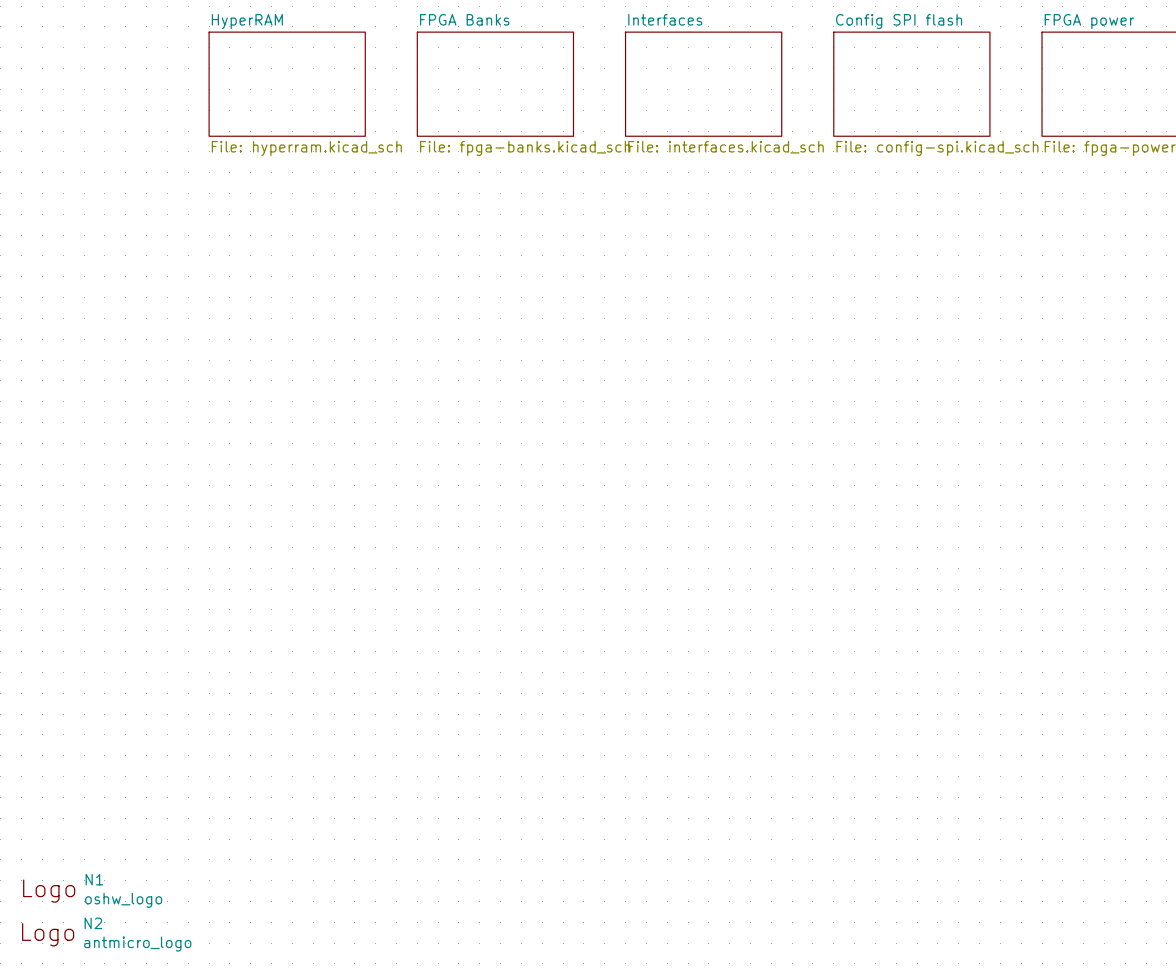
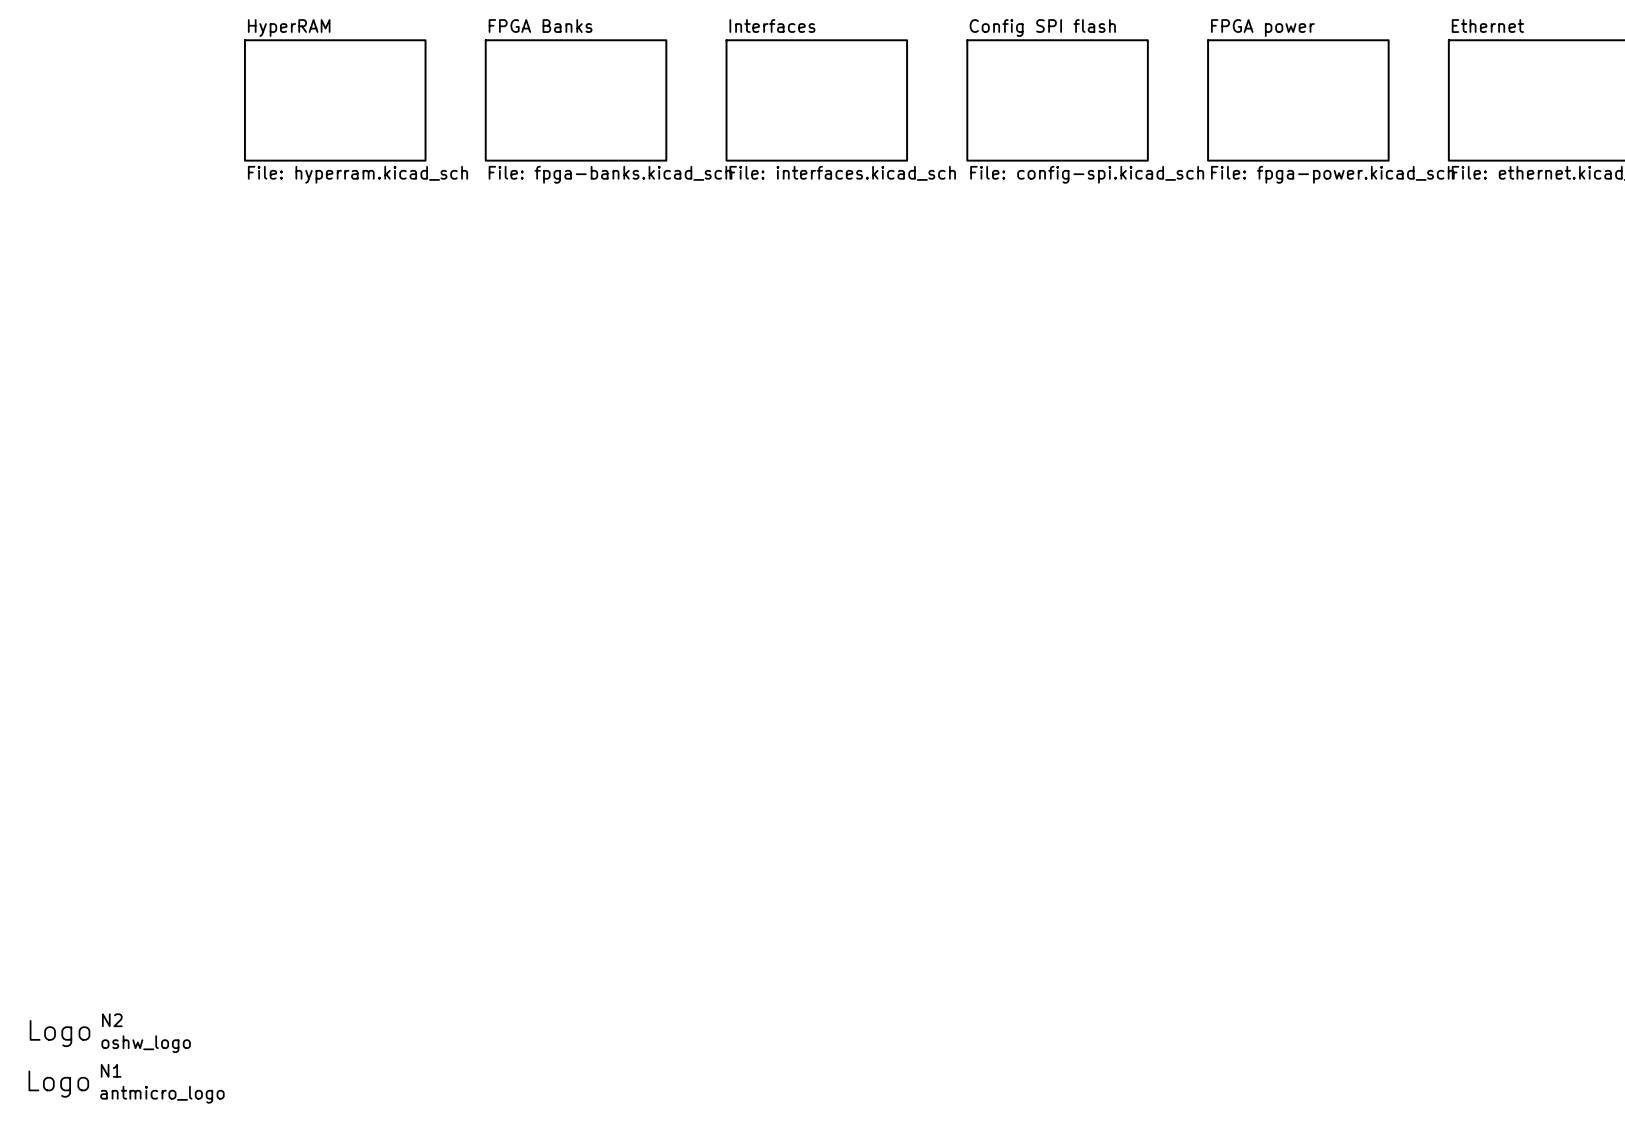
N1 name: N1 (94, 879) -> N2 (112, 1020)
N2 name: N2 (93, 923) -> N1 (111, 1070)

